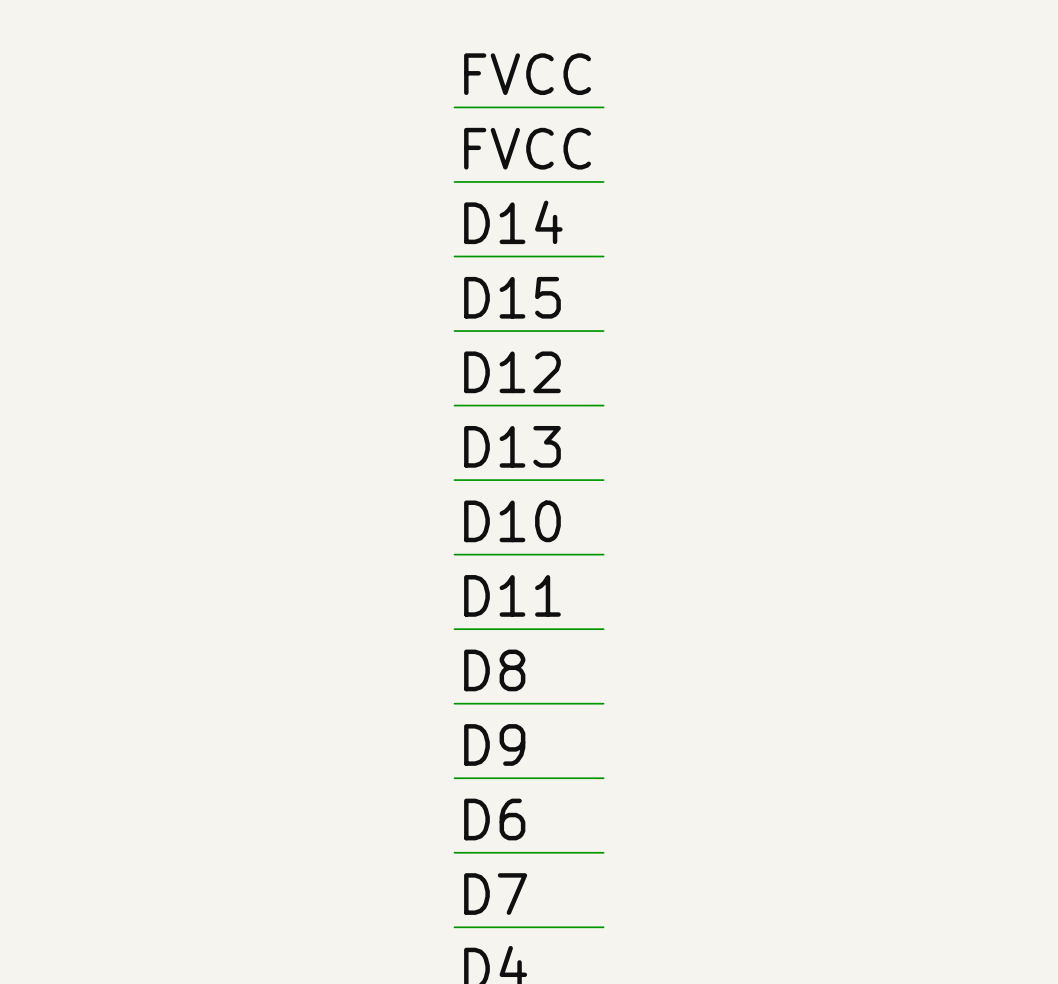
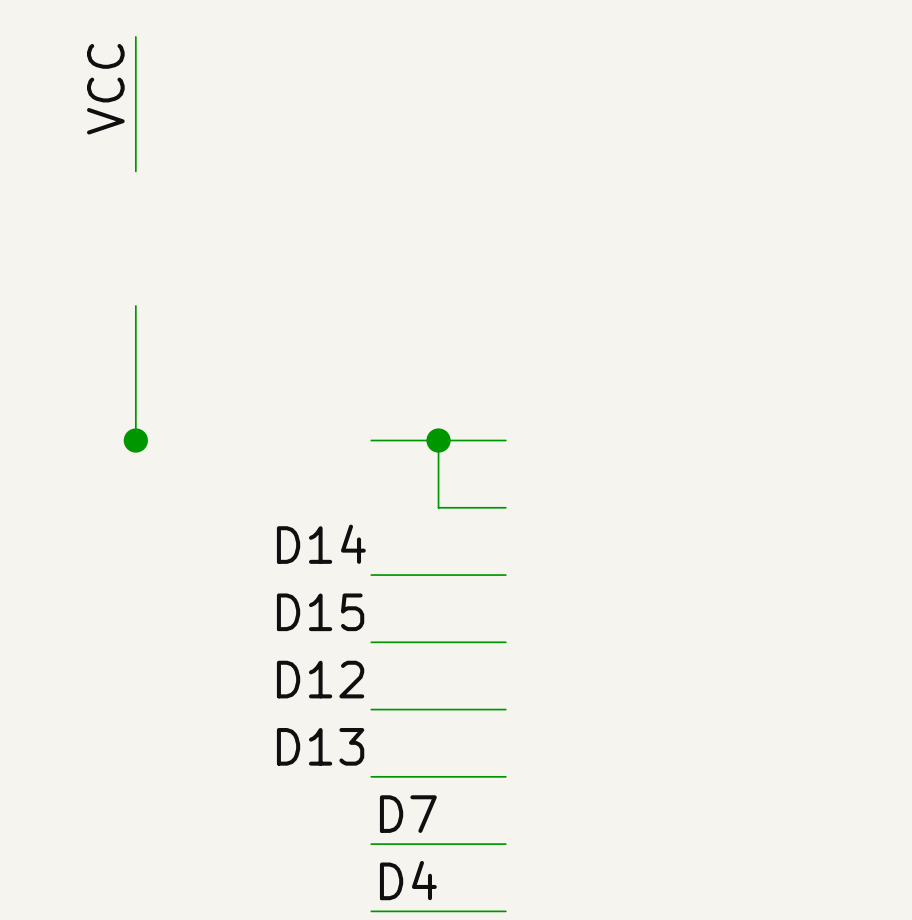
wire: none -> (135, 36) (135, 171)
label: FVCC (527, 74) -> none
label: none -> VCC (105, 89)
wire: (454, 107) (603, 107) -> none
label: FVCC (527, 148) -> none
wire: (454, 181) (603, 181) -> none
label: D14 (513, 222) -> none
wire: (454, 256) (603, 256) -> none
label: D15 (512, 297) -> none
wire: none -> (135, 305) (135, 440)
wire: (454, 331) (603, 331) -> none
label: D12 (512, 372) -> none
wire: (454, 405) (603, 405) -> none
label: D13 (512, 446) -> none
junction: none -> (135, 440)
junction: none -> (438, 440)
label: D10 (512, 521) -> none
wire: (454, 554) (529, 554) -> (438, 440) (438, 507)
label: D11 (512, 595) -> D14 (321, 544)
label: D8 (494, 670) -> D15 (320, 612)
label: D9 (494, 744) -> D12 (320, 679)
label: D6 (494, 819) -> D13 (320, 746)

